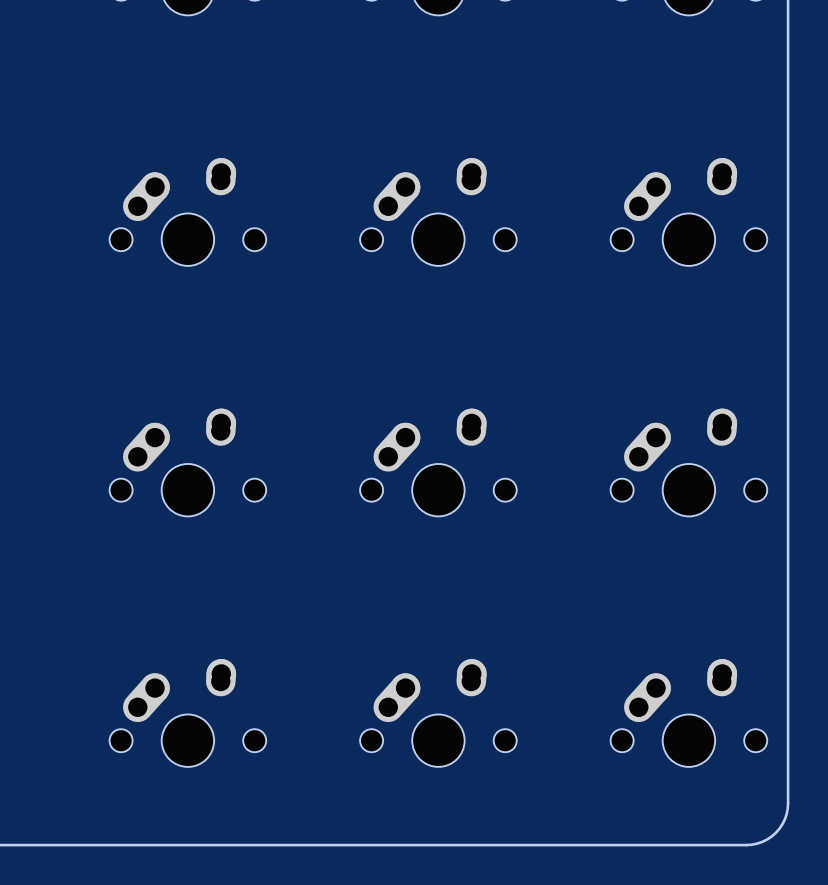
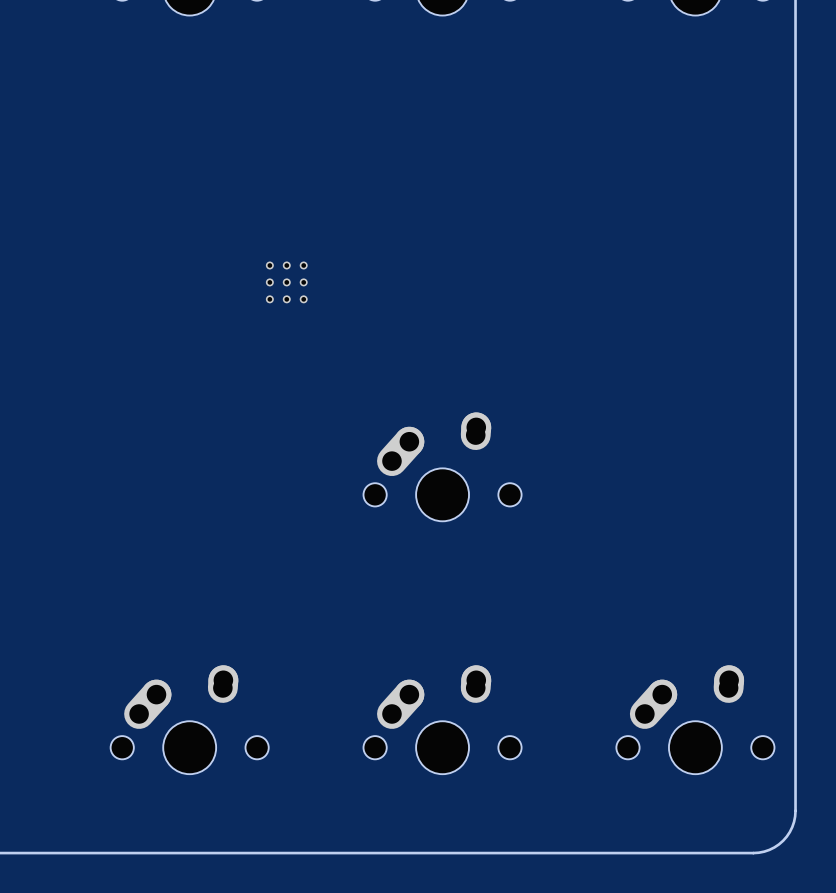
part: (187, 212) -> none
part: (438, 212) -> none
part: (688, 212) -> none
part: none -> (286, 282)
part: (187, 462) -> none
part: (688, 462) -> none

